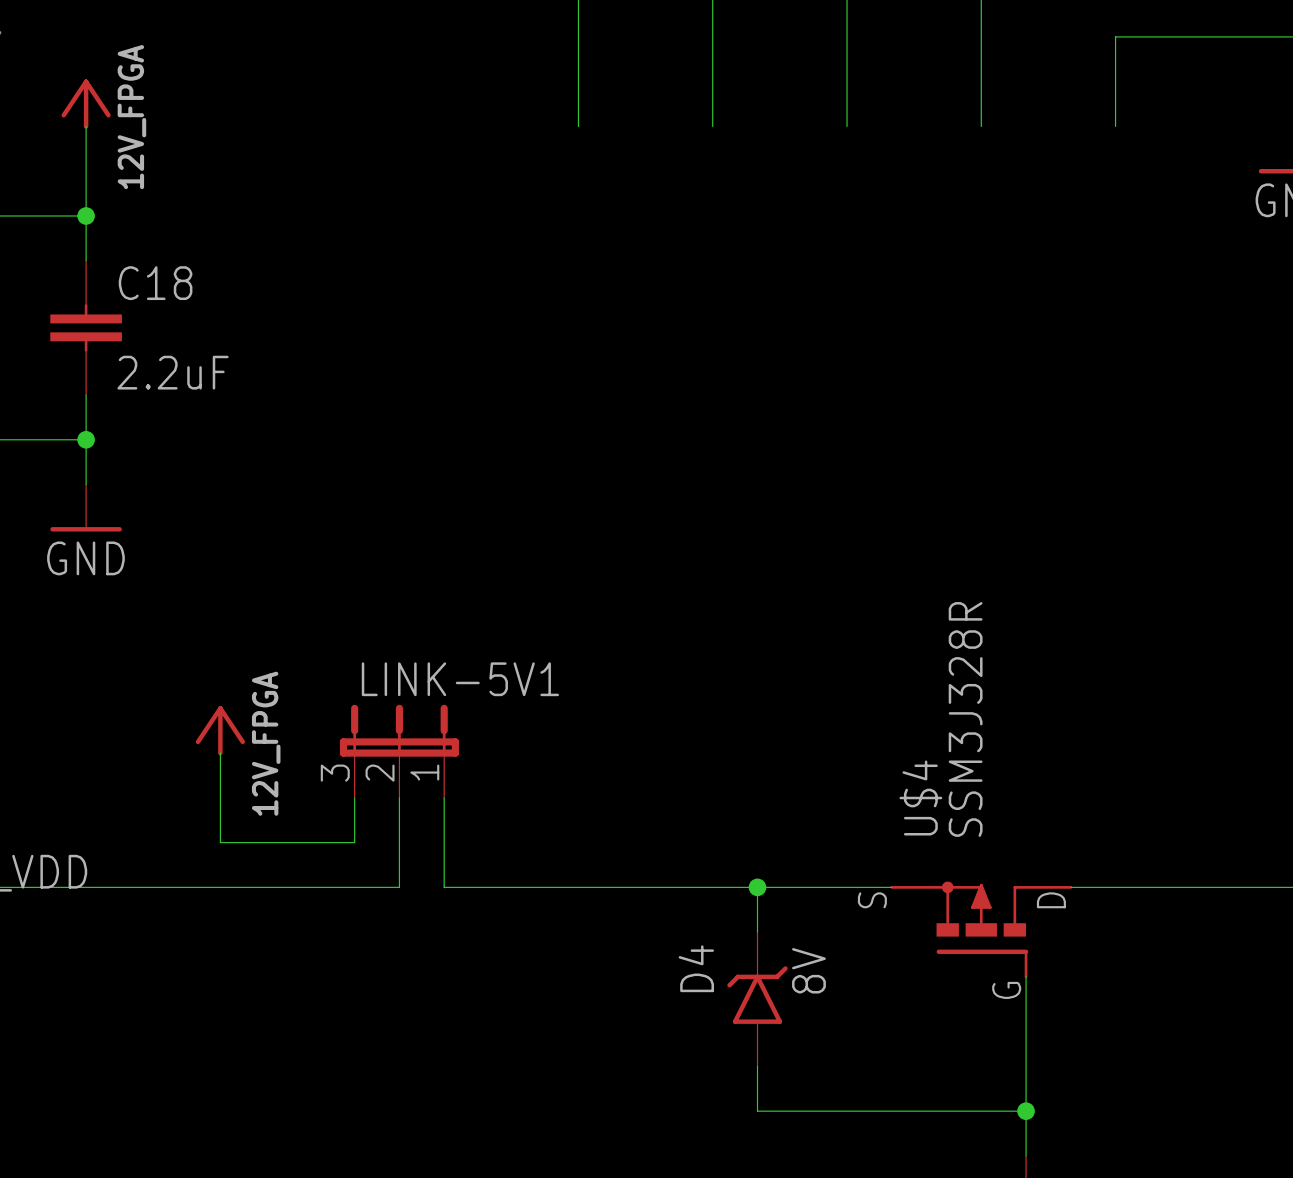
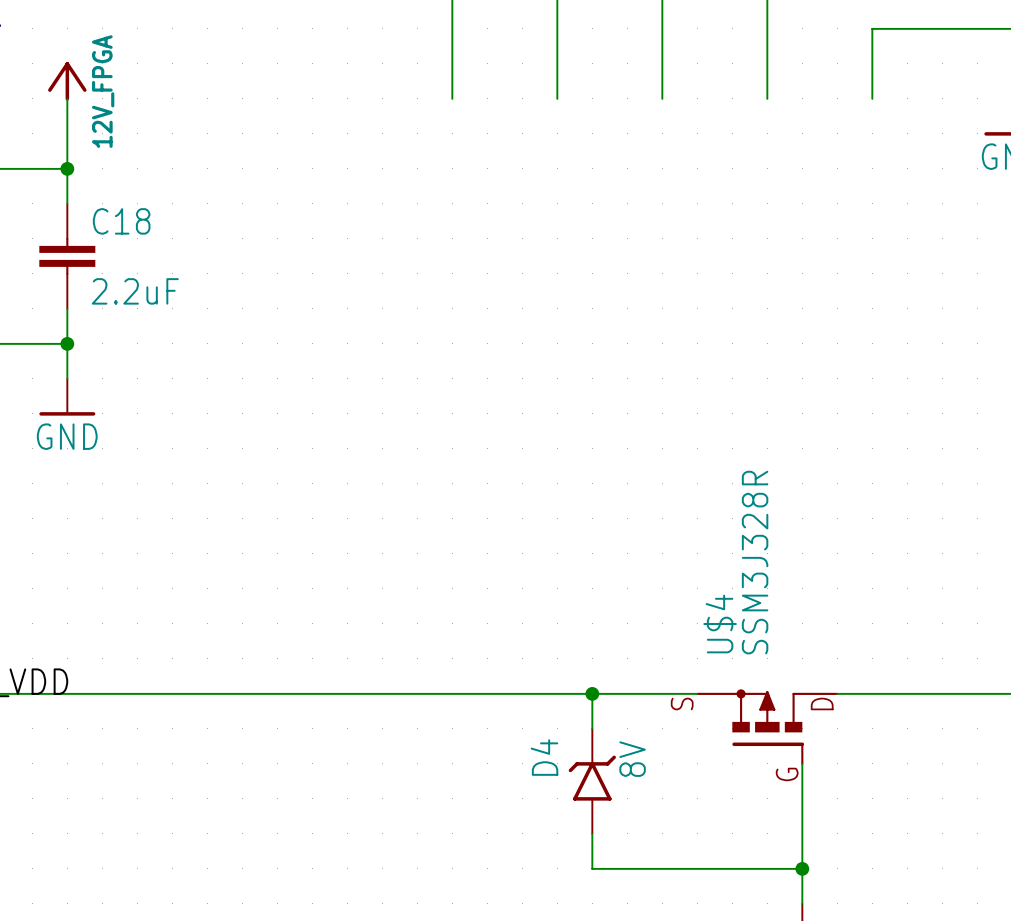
part: 12V_FPGA (220, 730) -> none
LINK-5V1: (399, 751) -> none
wire: (220, 753) (220, 842) (354, 842) (354, 797) -> none
wire: (399, 797) (399, 887) -> (347, 693) (312, 693)
wire: (444, 797) (444, 887) -> none

